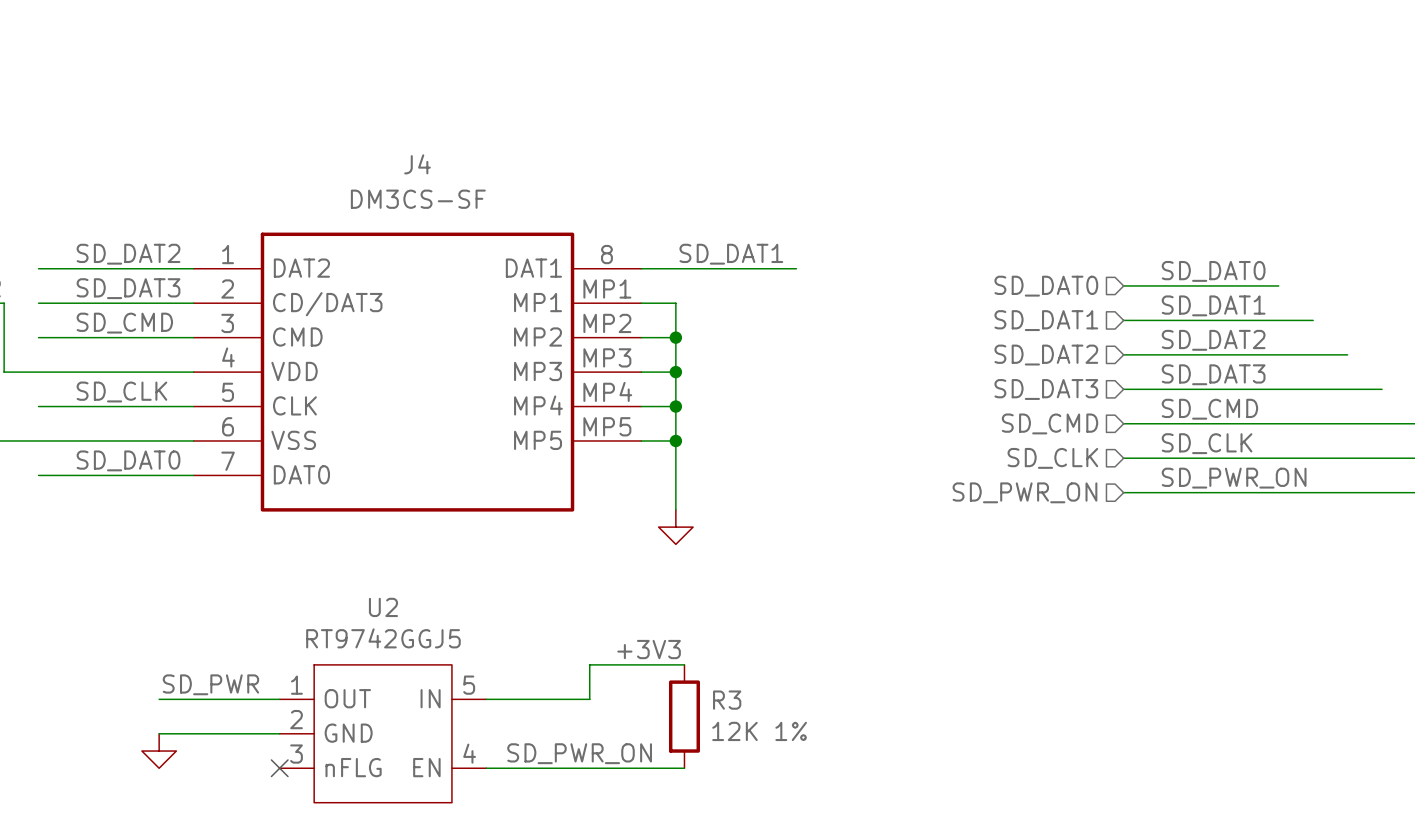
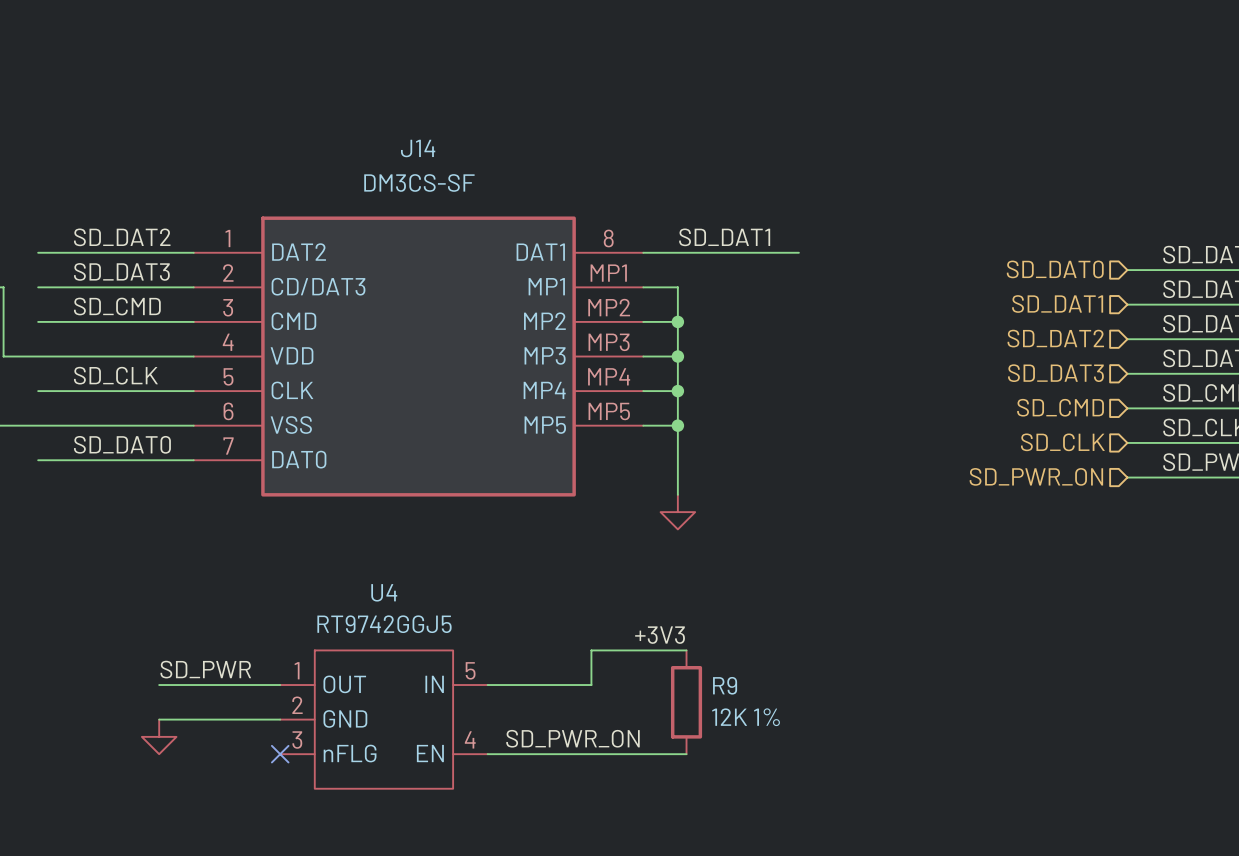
J4 name: J4 (417, 164) -> J14 (418, 148)
U2 name: U2 (383, 607) -> U4 (384, 592)
R3 name: R3 (727, 700) -> R9 (725, 685)

